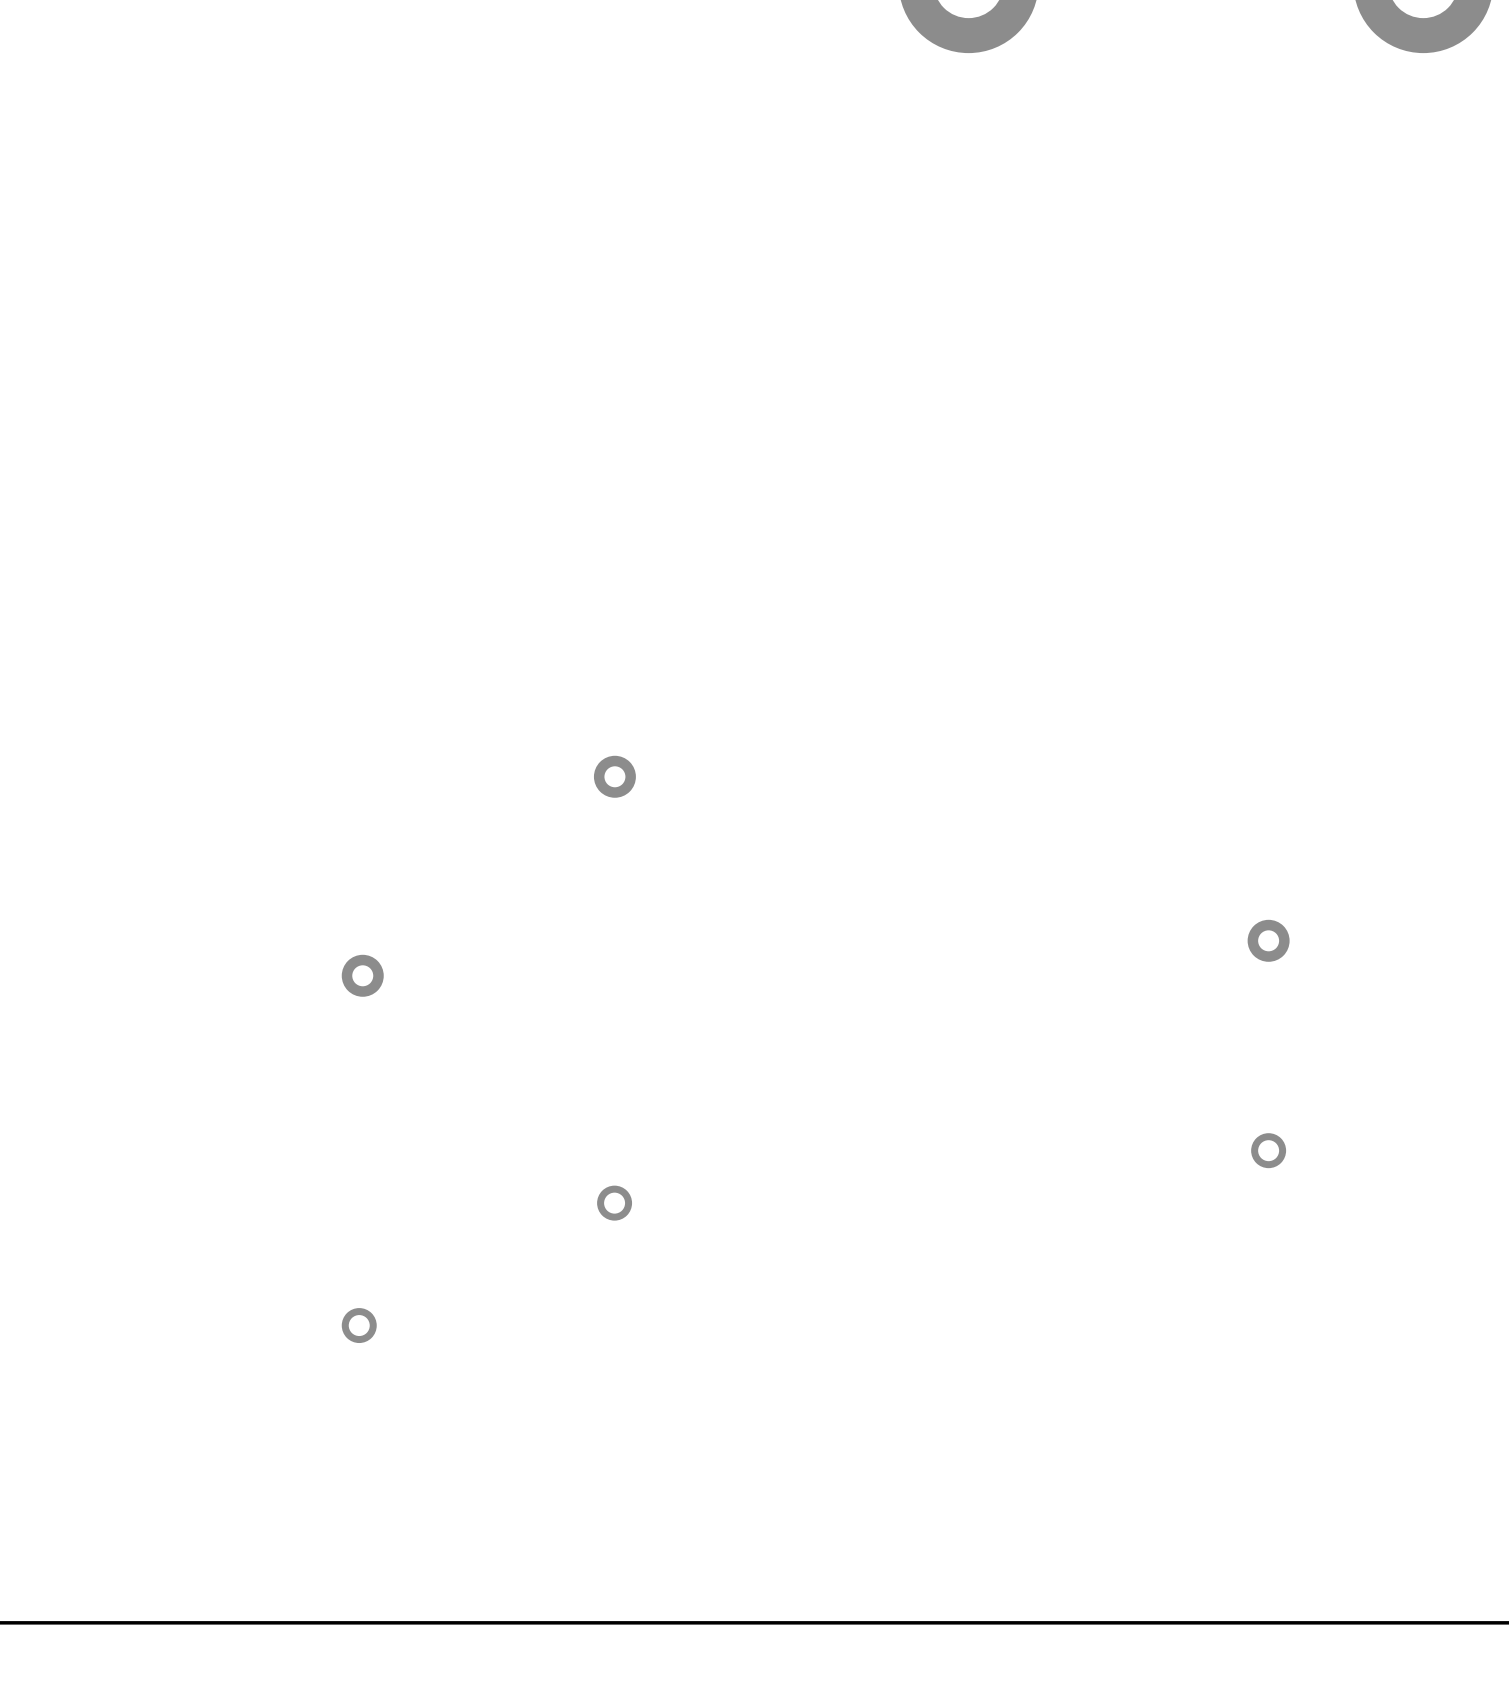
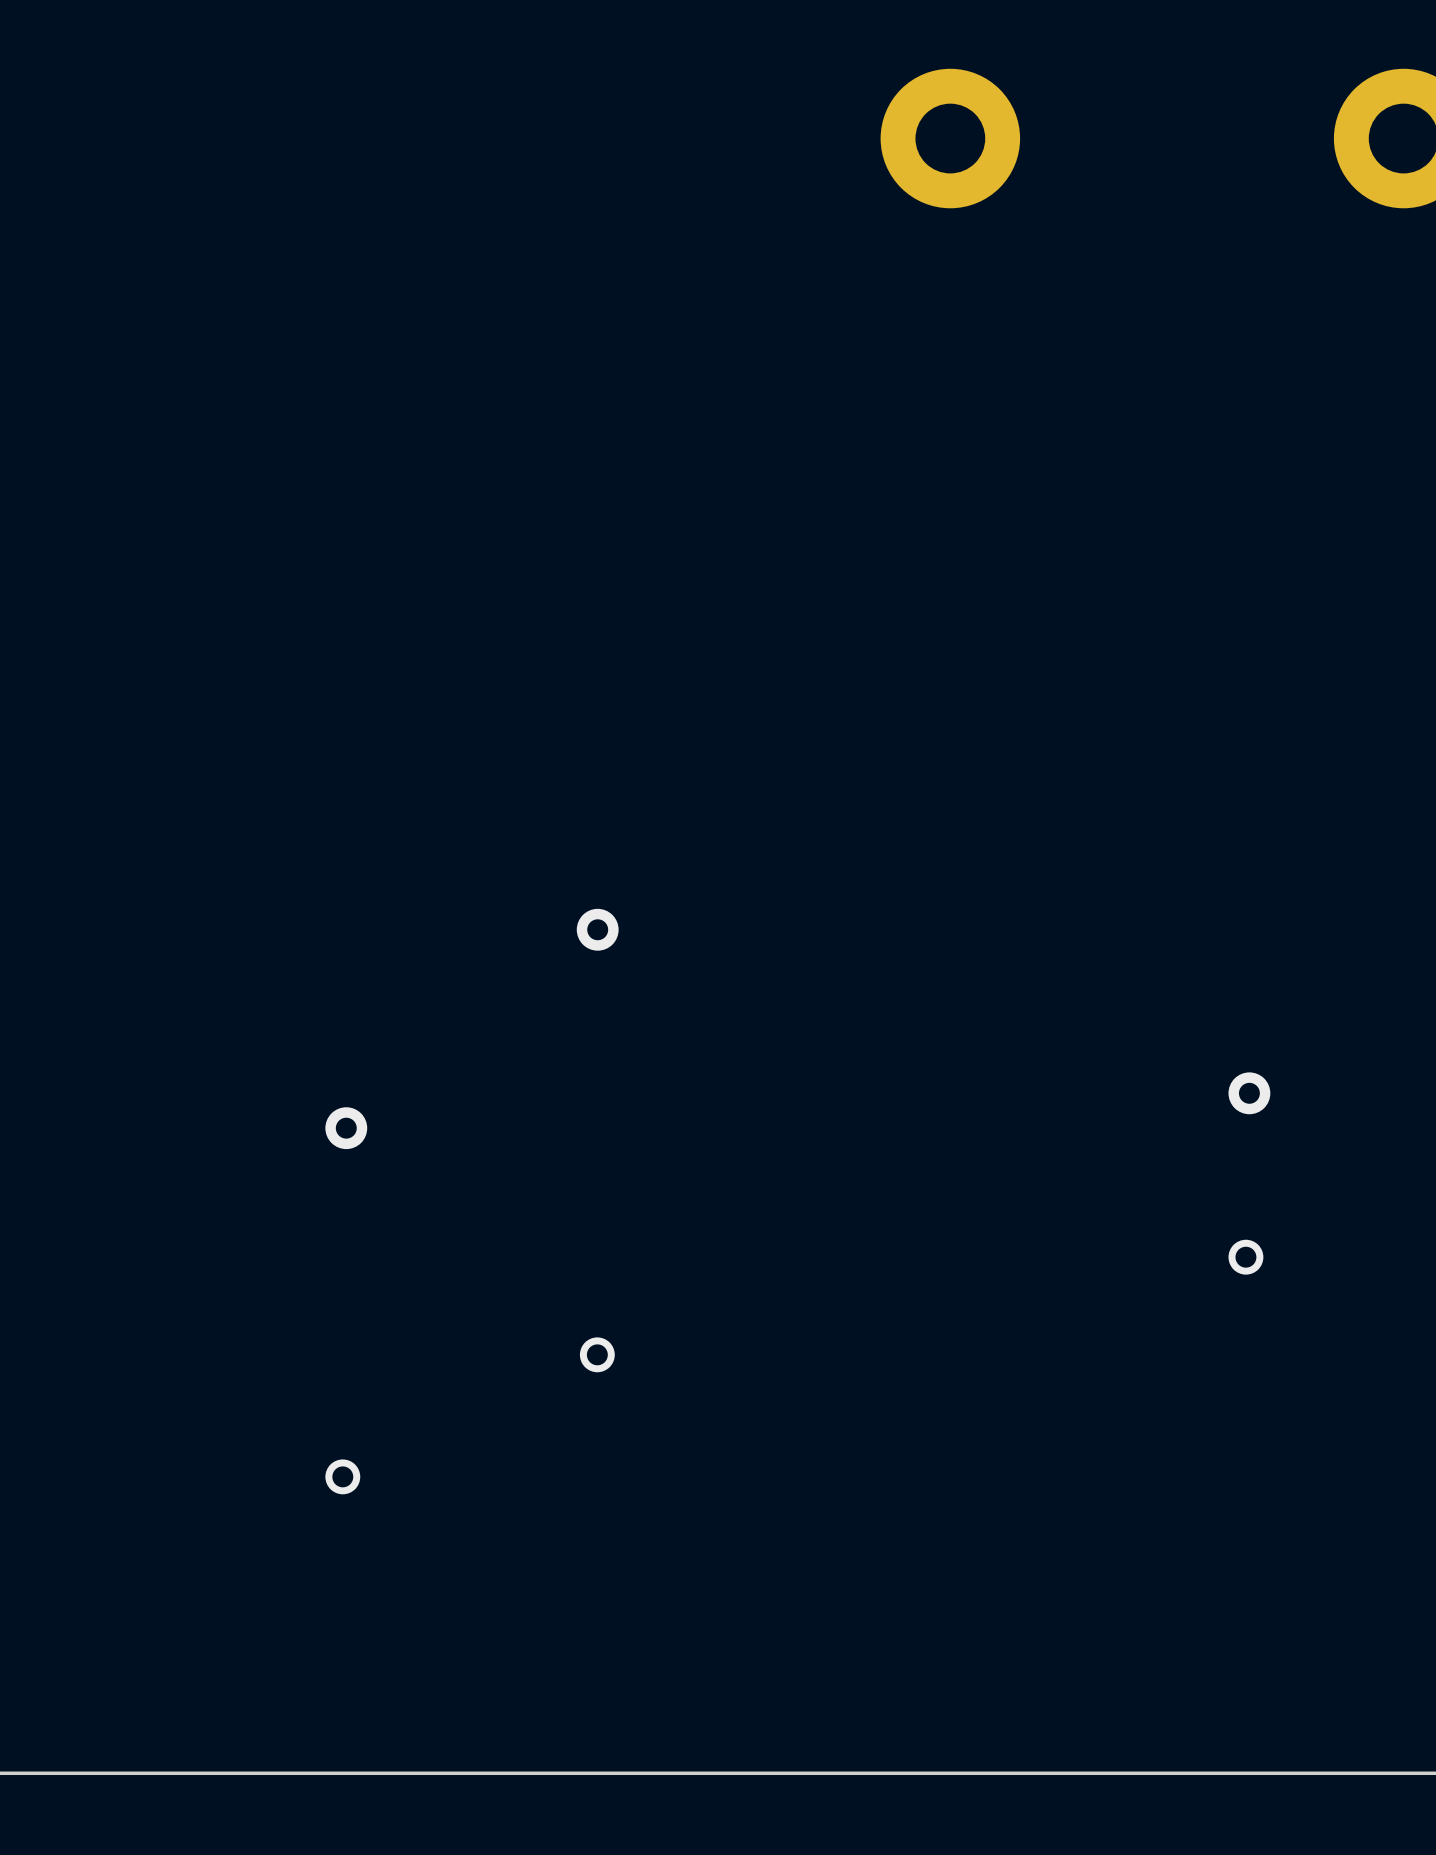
via position: (1268, 1150) -> (1245, 1257)

